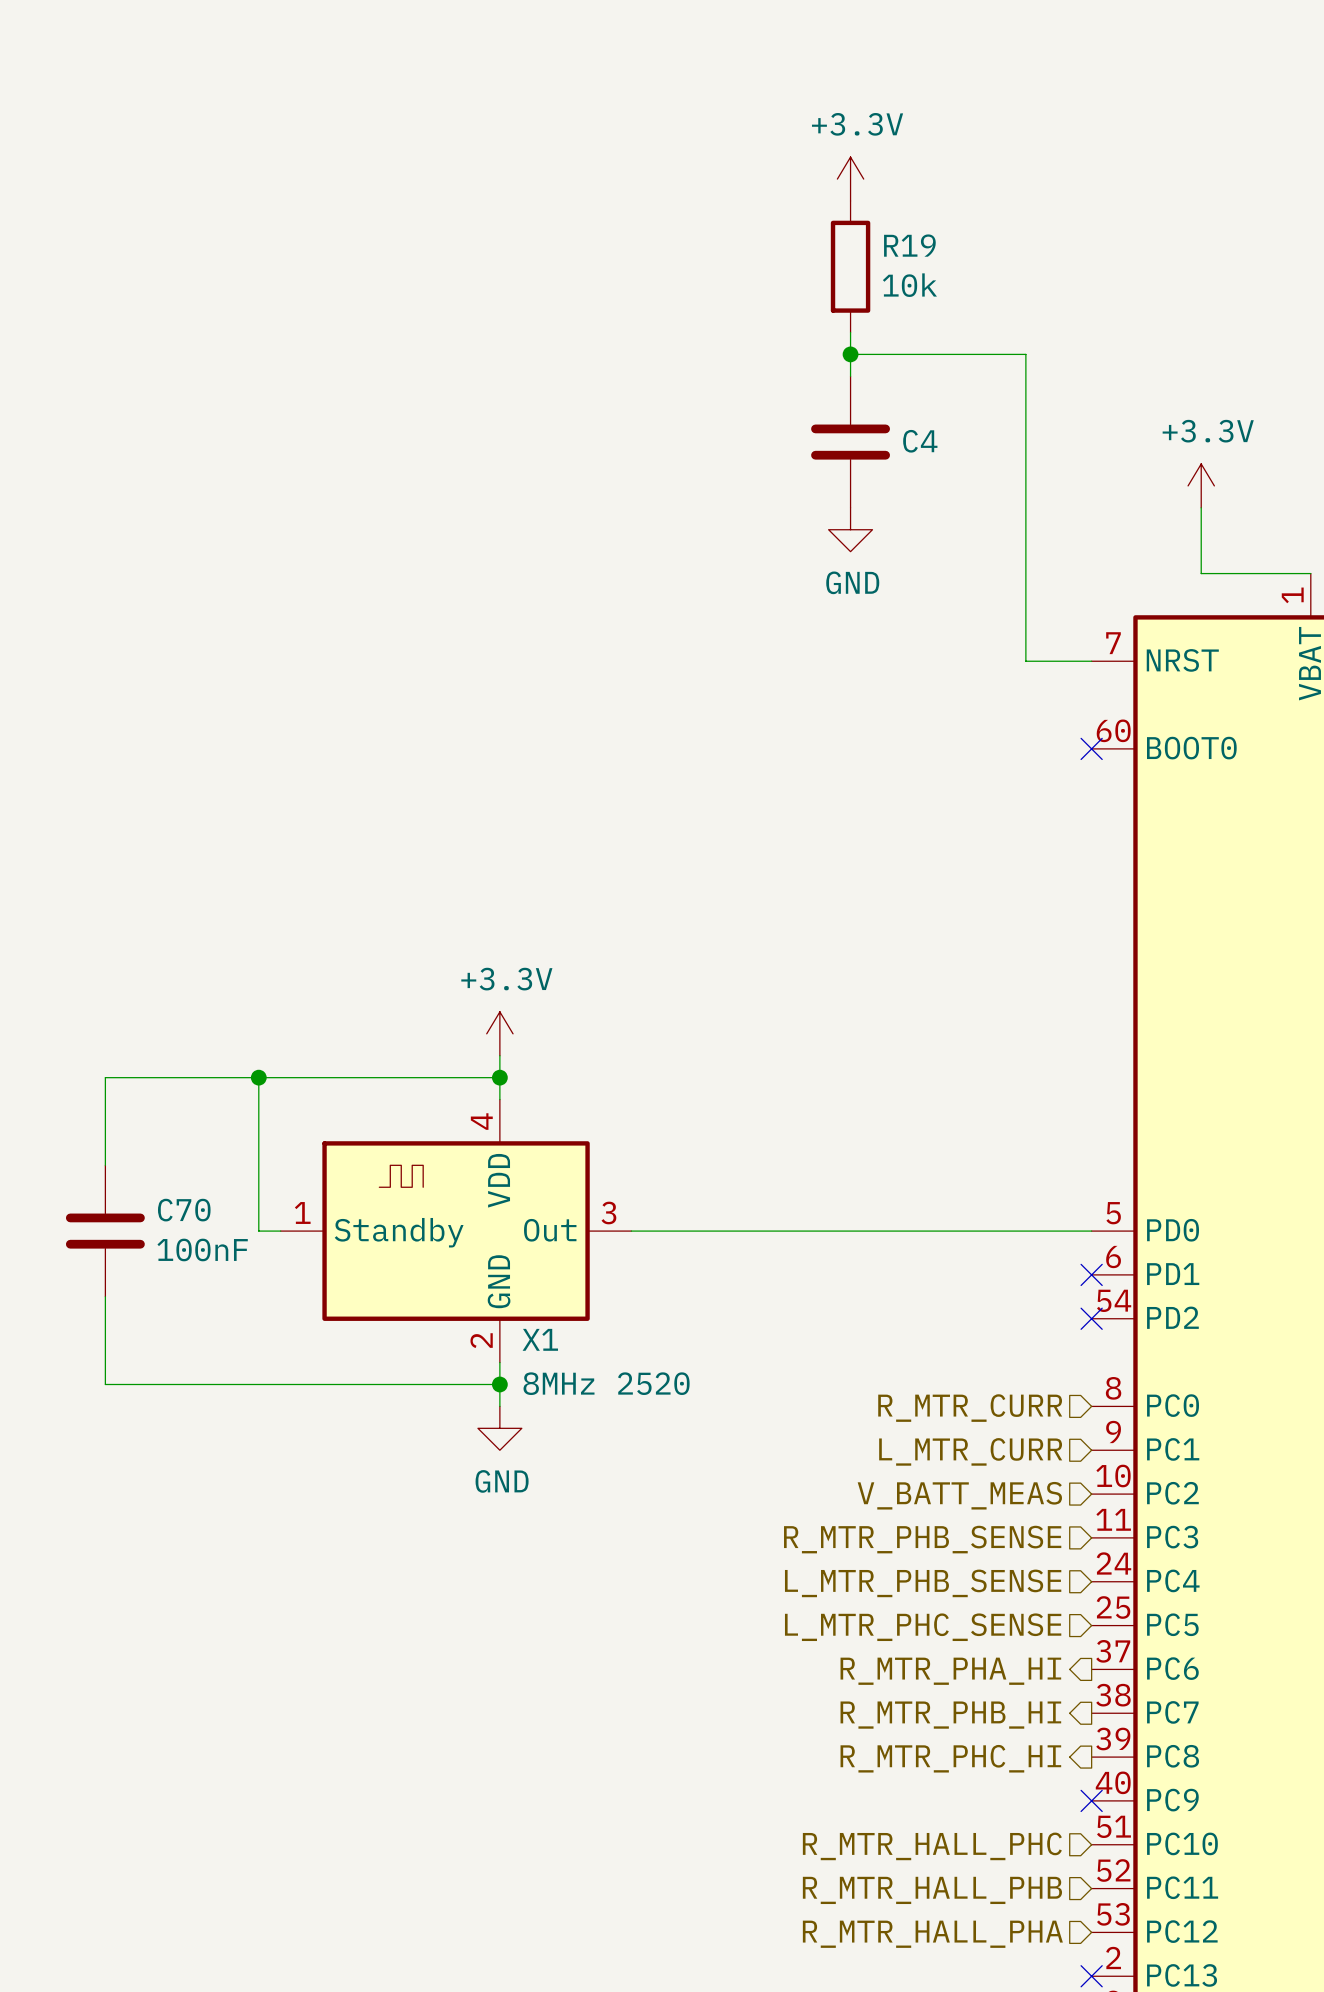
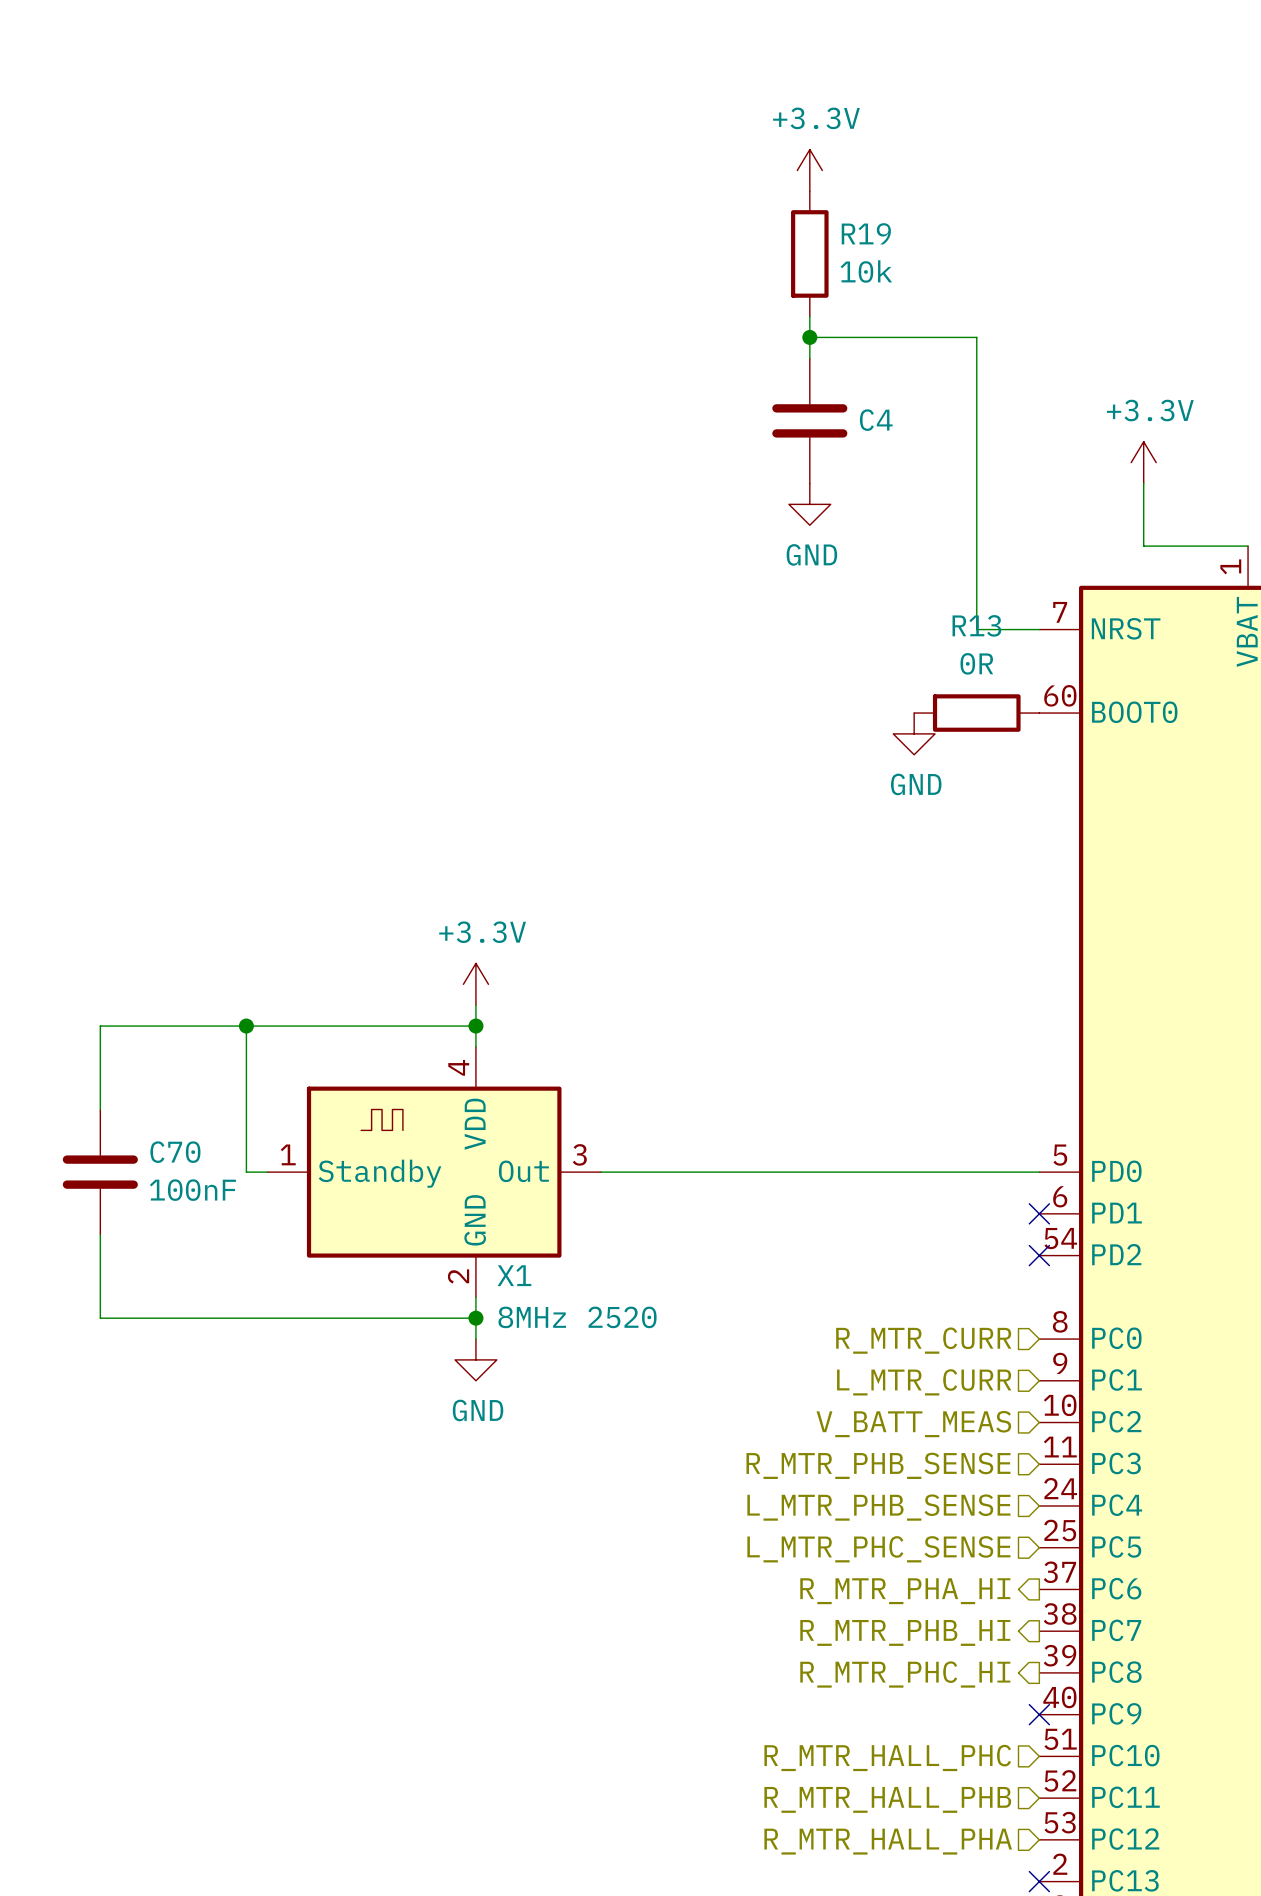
R13: none -> 0R (976, 713)
no-connect mark: (1091, 748) -> none
power symbol: none -> GND (914, 733)

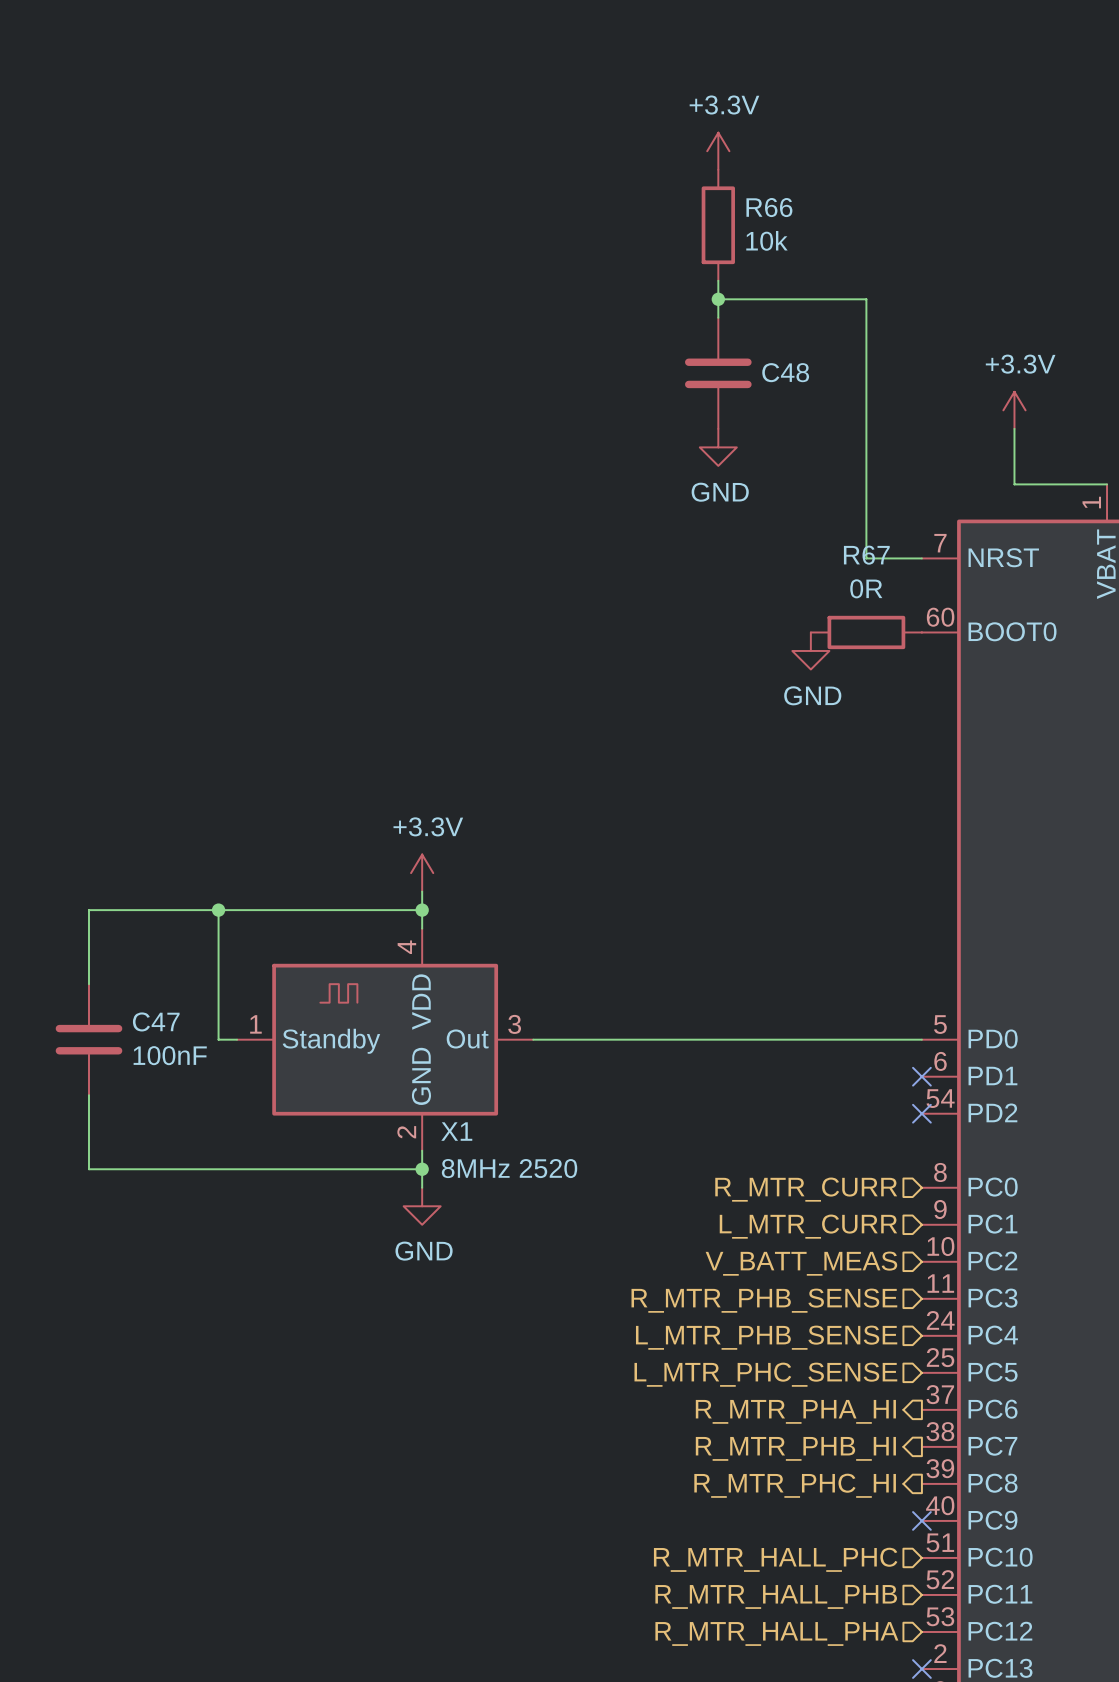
R19 name: R19 (866, 233) -> R66 (769, 207)
C4 name: C4 (876, 420) -> C48 (785, 372)
R13 name: R13 (976, 625) -> R67 (866, 555)
C70 name: C70 (175, 1152) -> C47 (156, 1021)

